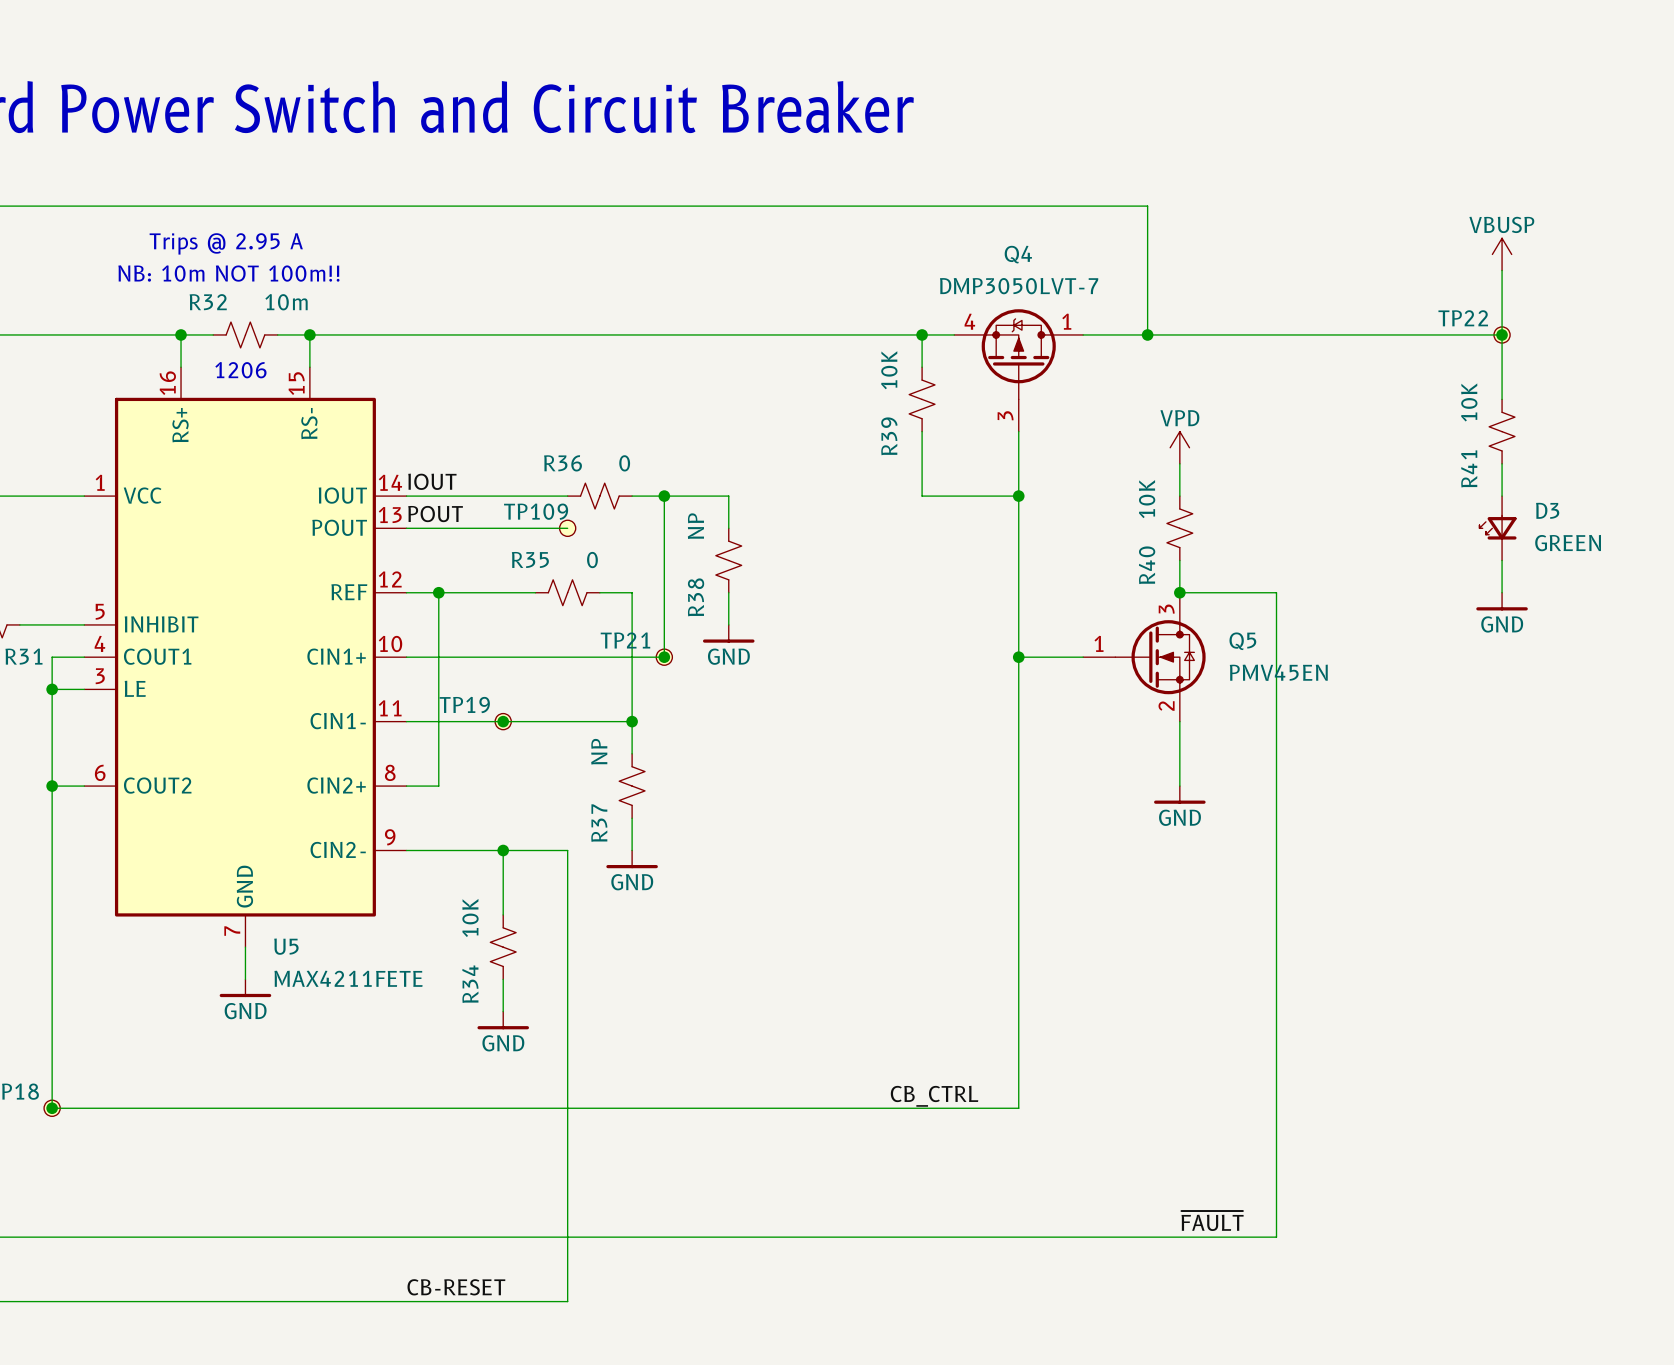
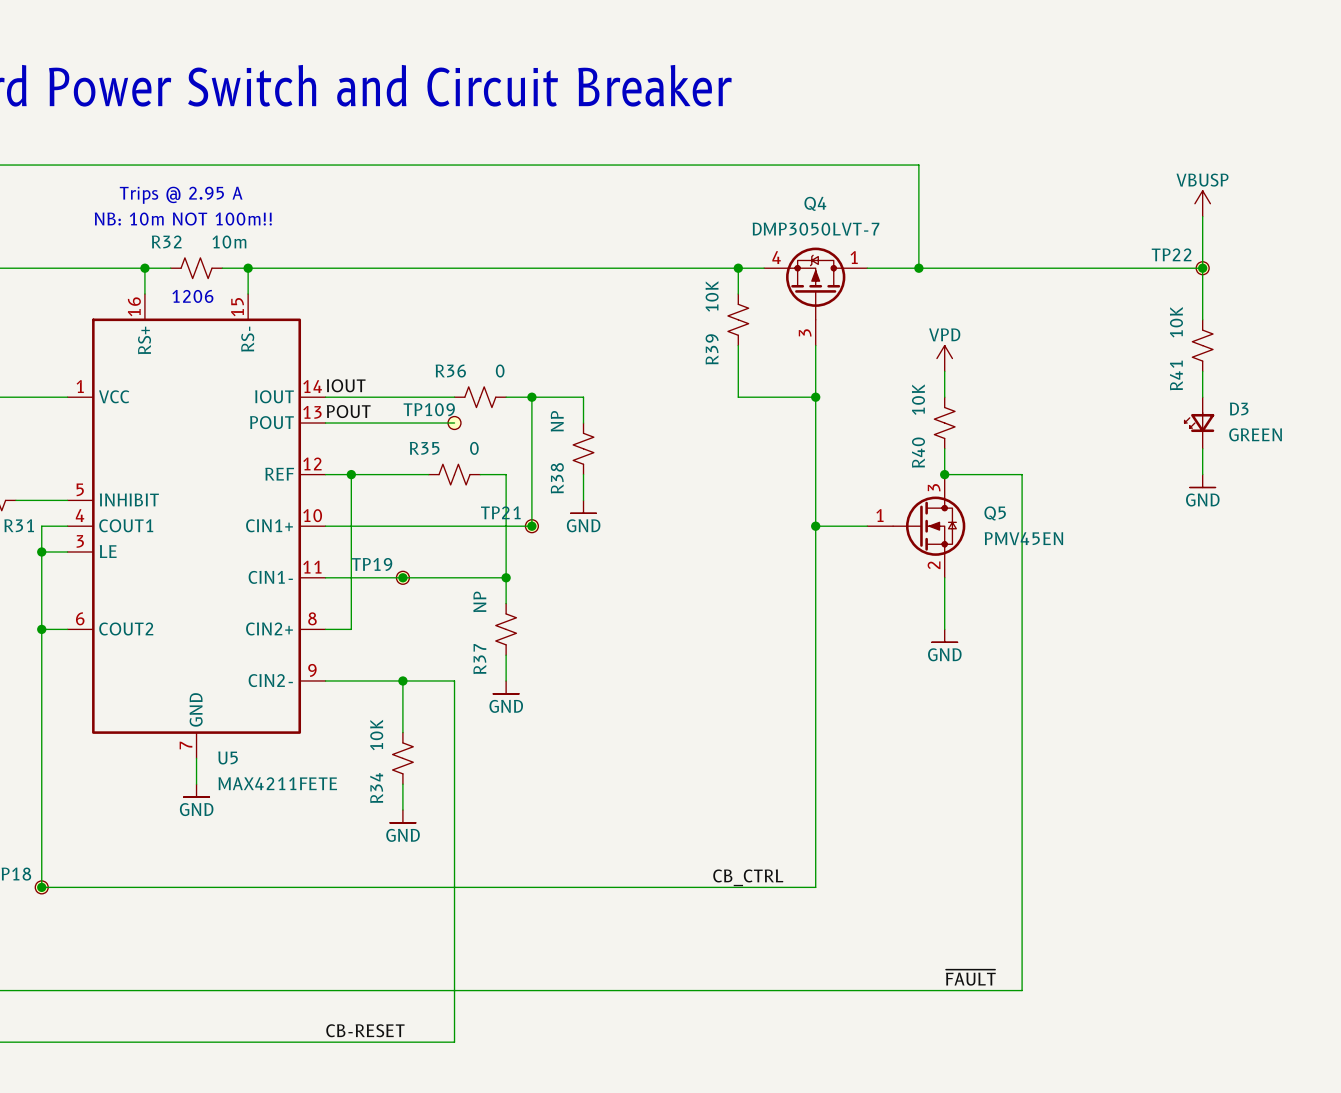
U5 symbol: [84, 367, 407, 948] -> [67, 294, 326, 759]
power symbol shape: [1476, 592, 1528, 611] -> [1189, 474, 1216, 488]
power symbol shape: [702, 624, 755, 643] -> [570, 500, 597, 514]
power symbol shape: [1154, 786, 1206, 804] -> [931, 629, 958, 643]
power symbol shape: [606, 850, 658, 869] -> [493, 680, 520, 694]
power symbol shape: [219, 979, 272, 998] -> [183, 784, 210, 798]
power symbol shape: [477, 1011, 529, 1030] -> [390, 809, 416, 823]

